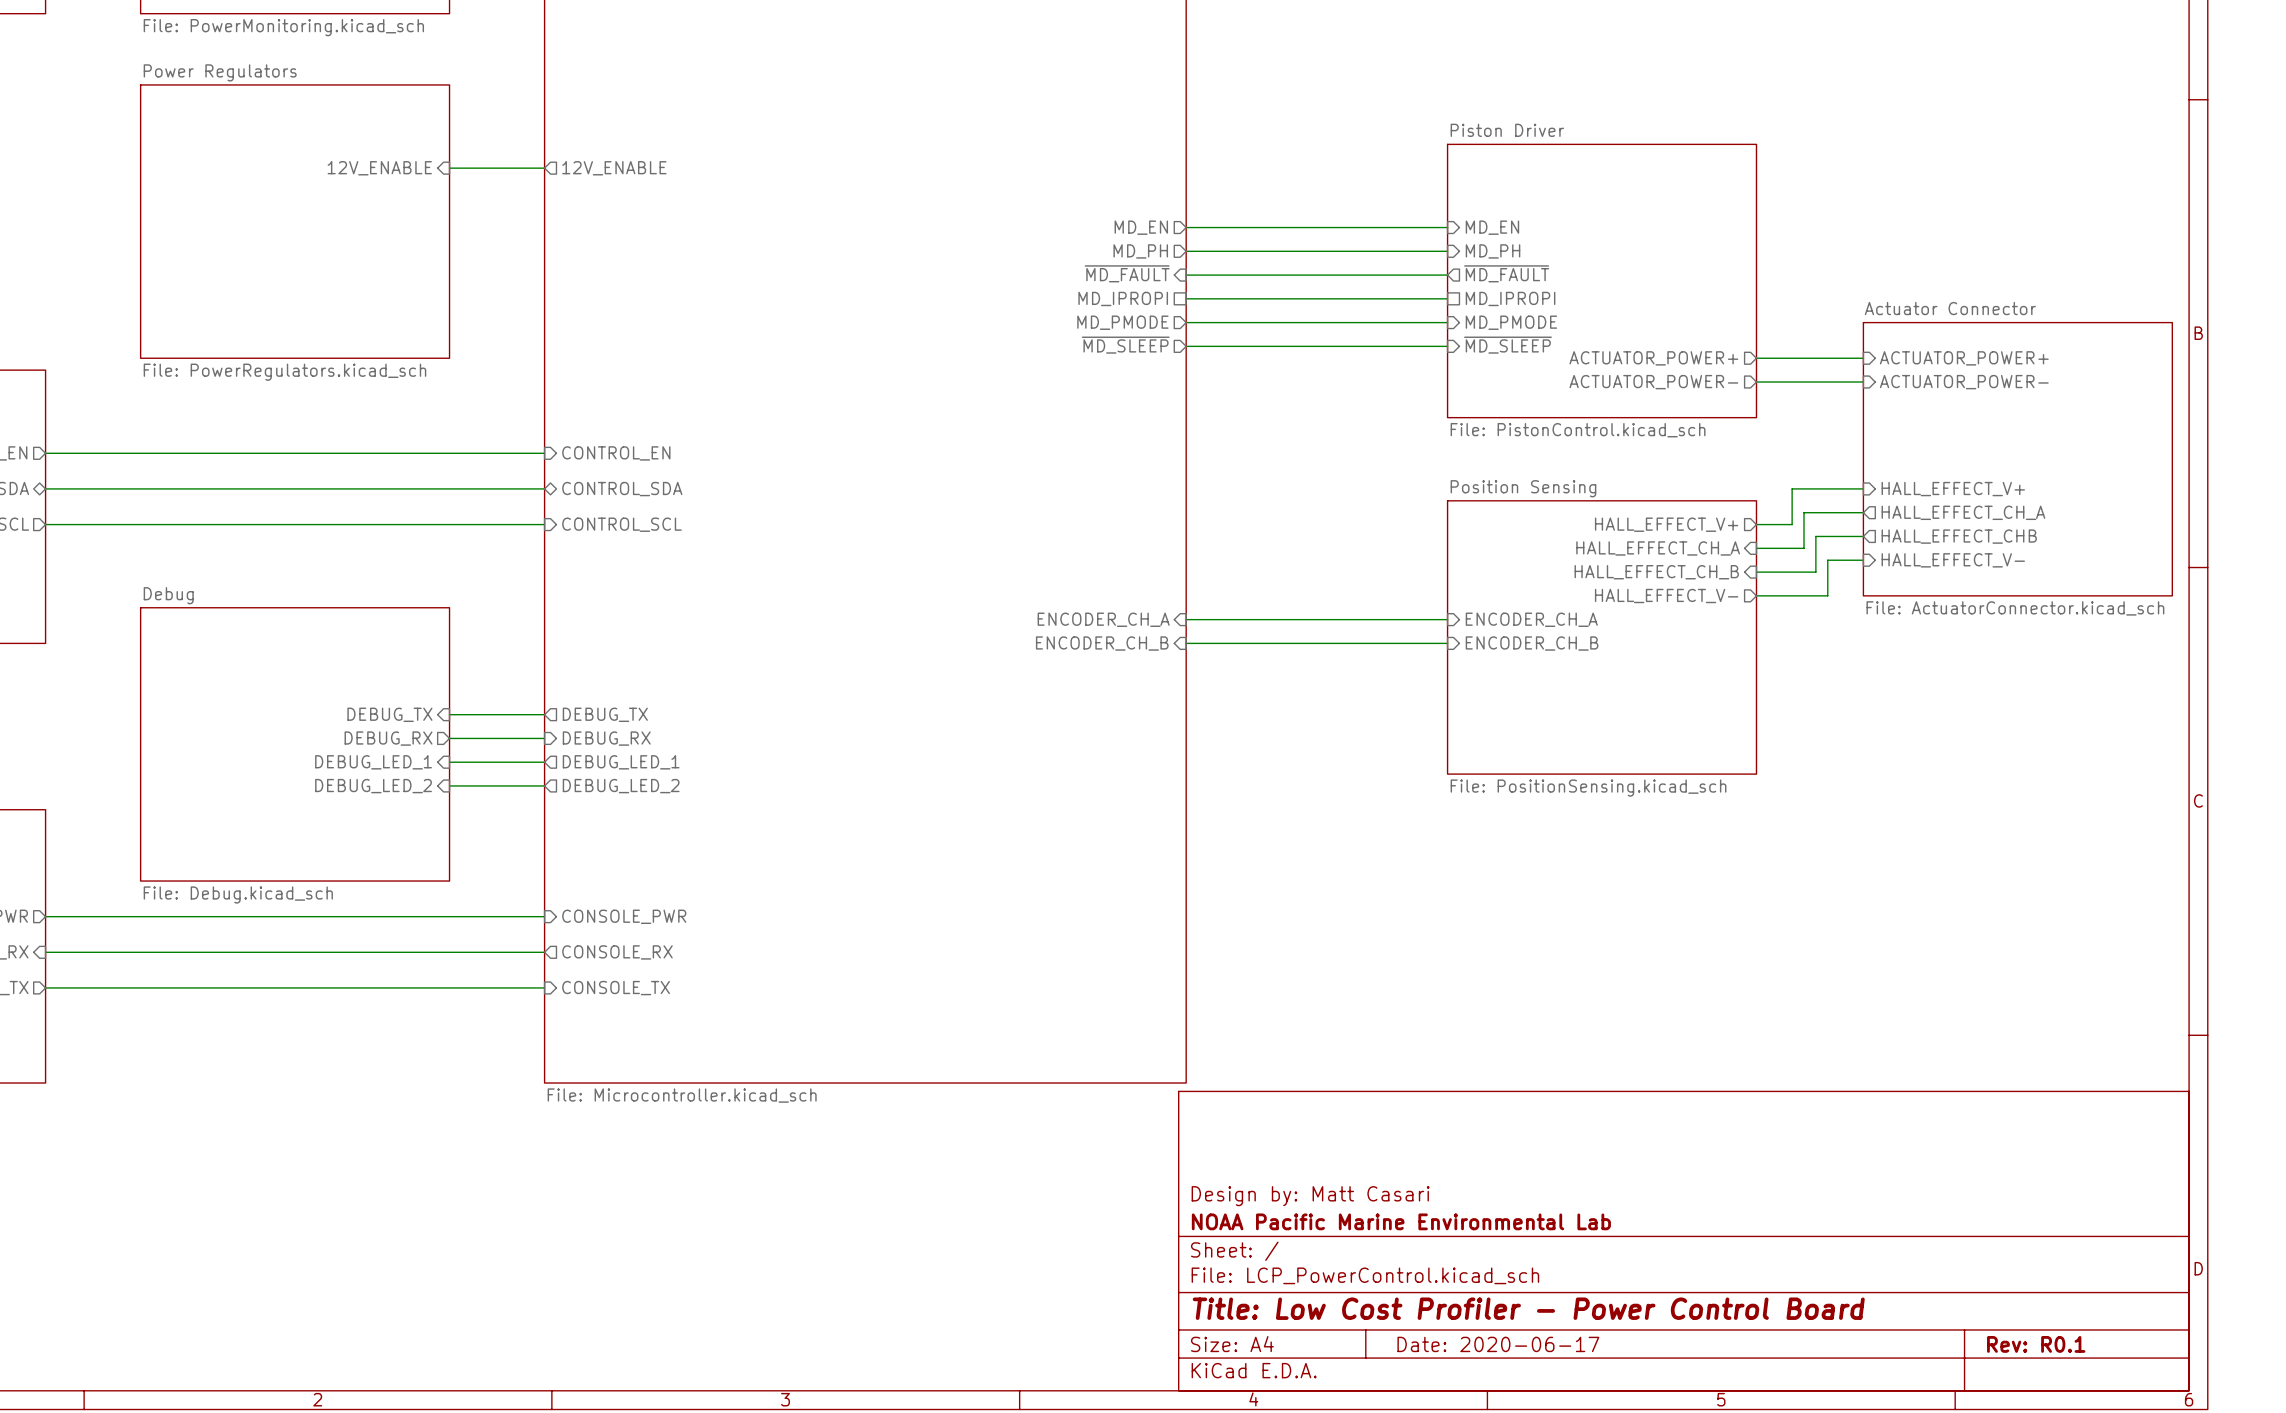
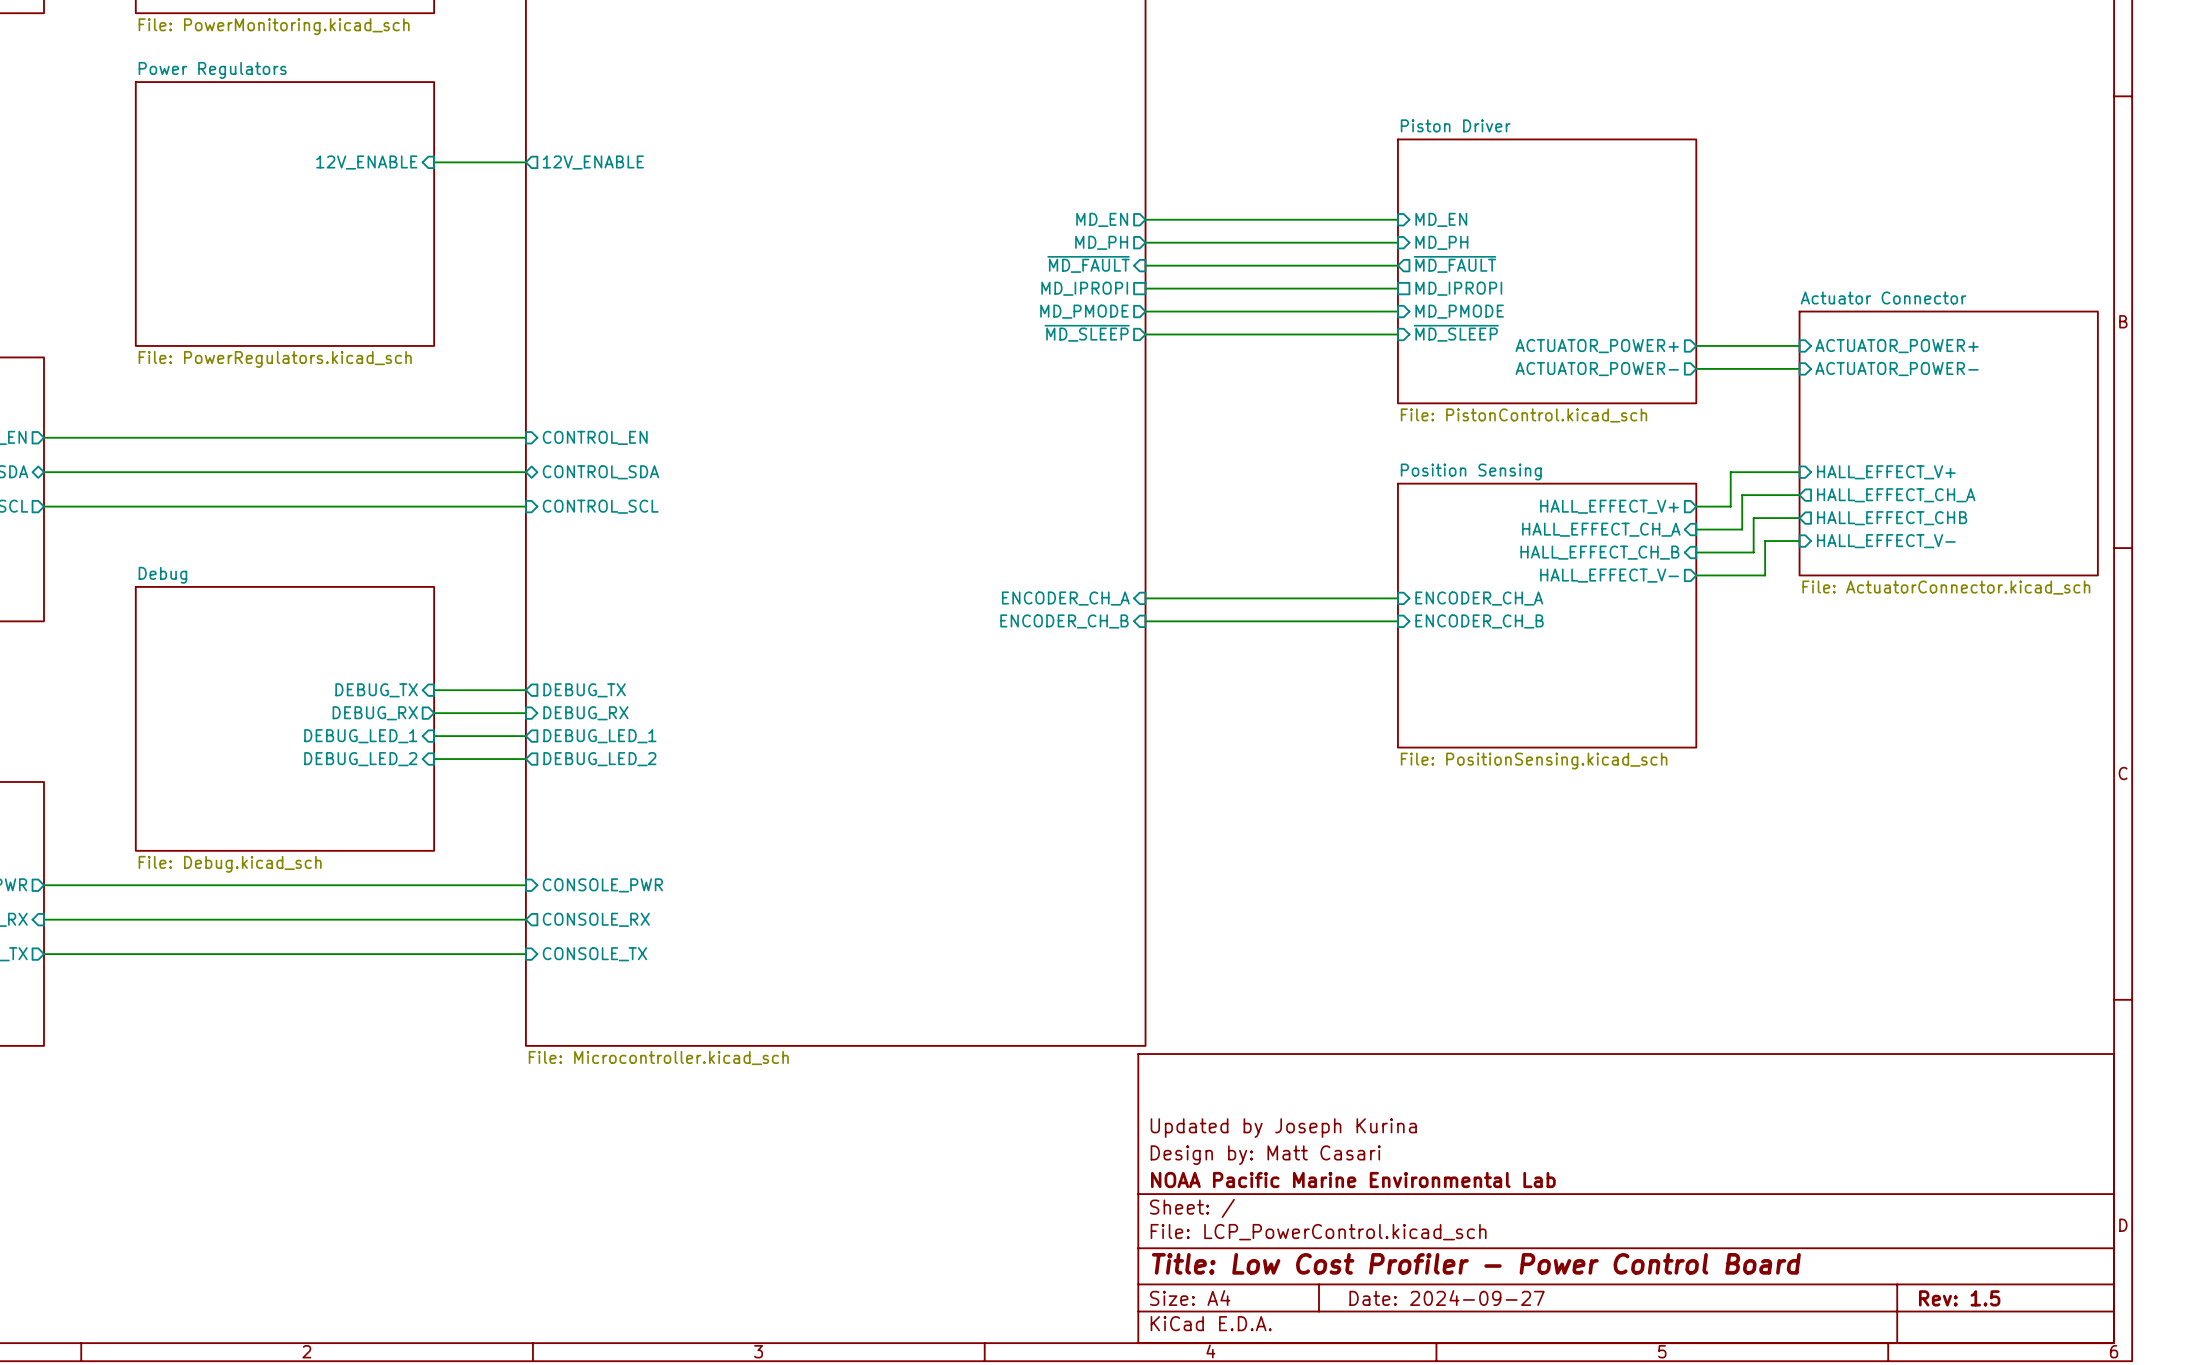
title block: none -> Updated by Joseph Kurina (1283, 1128)
title block: Date: 2020-06-17 (1498, 1344) -> Date: 2024-09-27 (1447, 1298)
title block: Rev: R0.1 (2036, 1344) -> Rev: 1.5 (1959, 1298)

